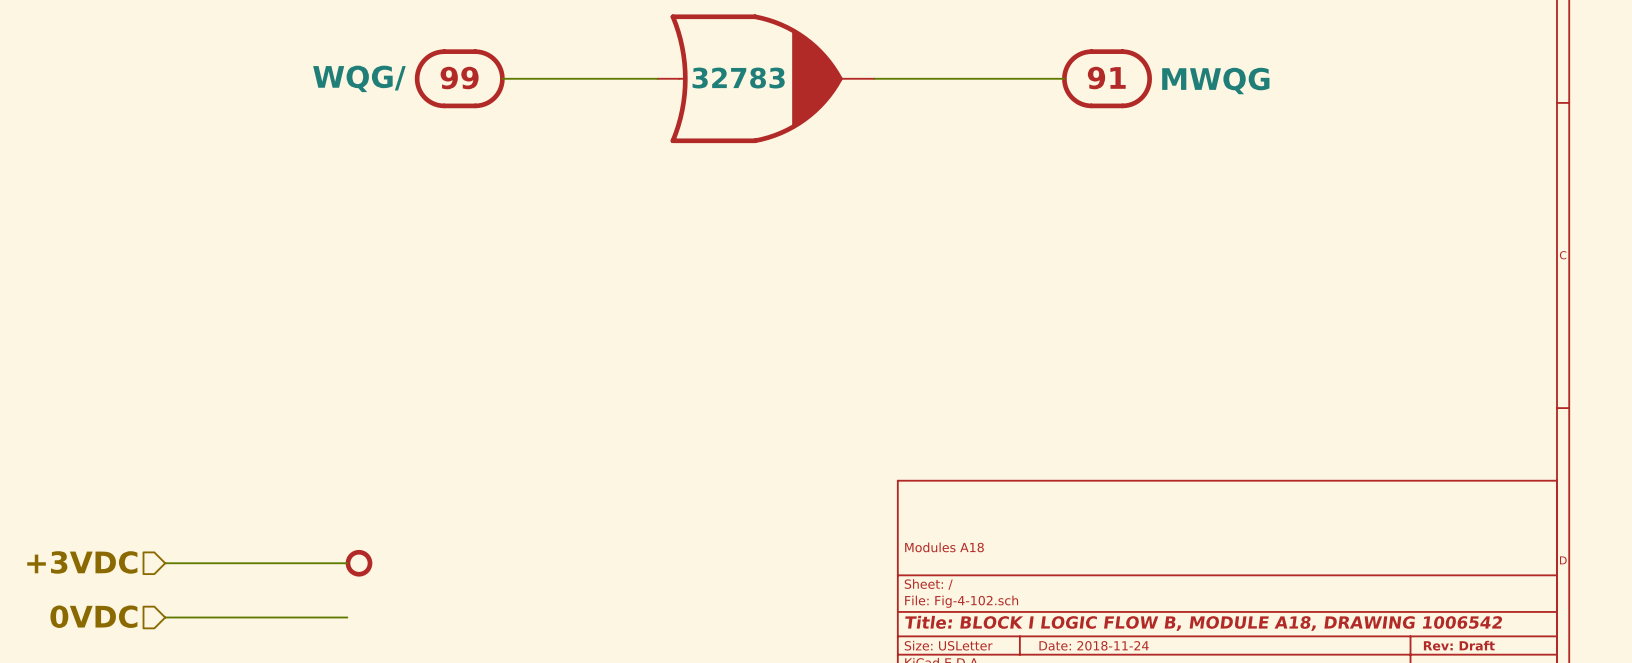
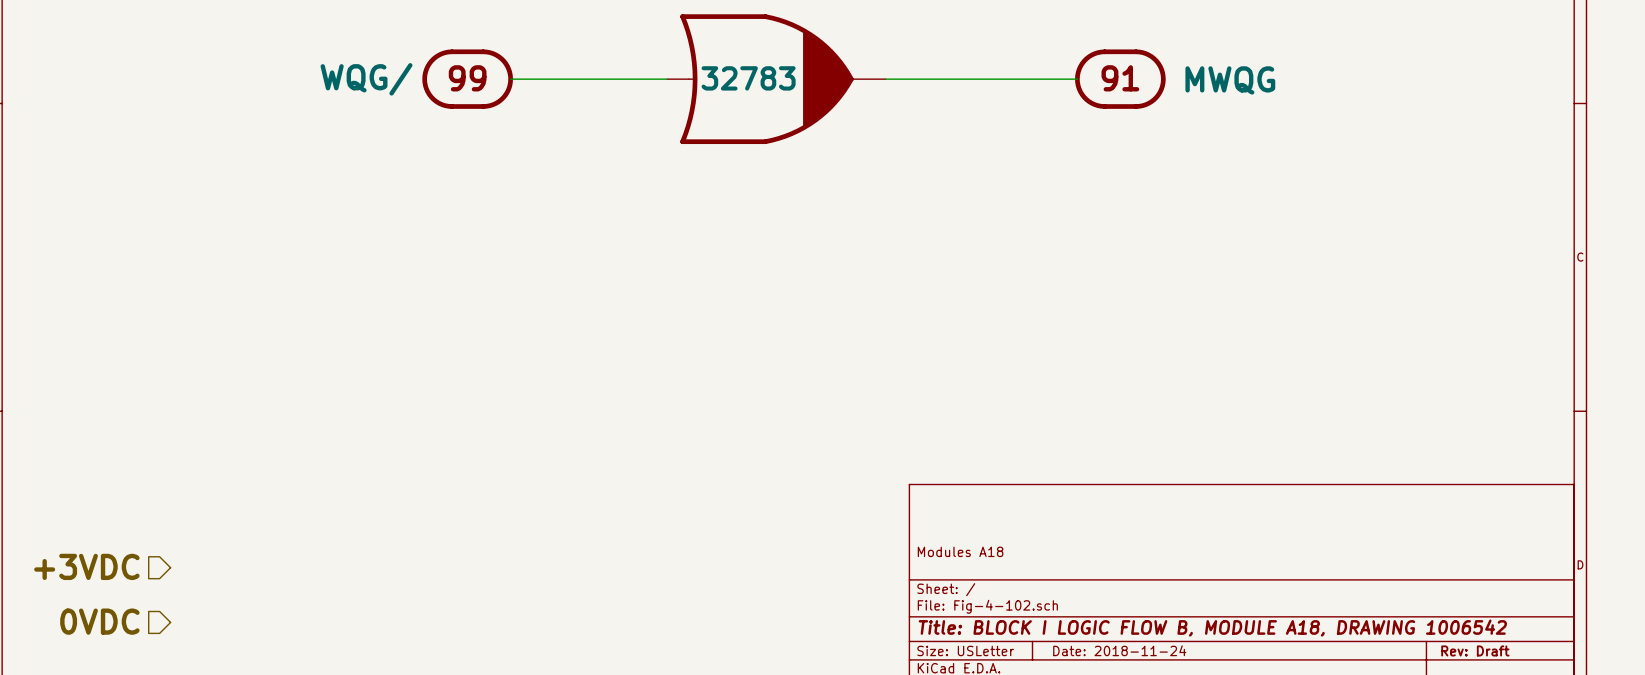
wire: (165, 563) (347, 563) -> none
part: (359, 563) -> none
wire: (165, 617) (347, 617) -> none

